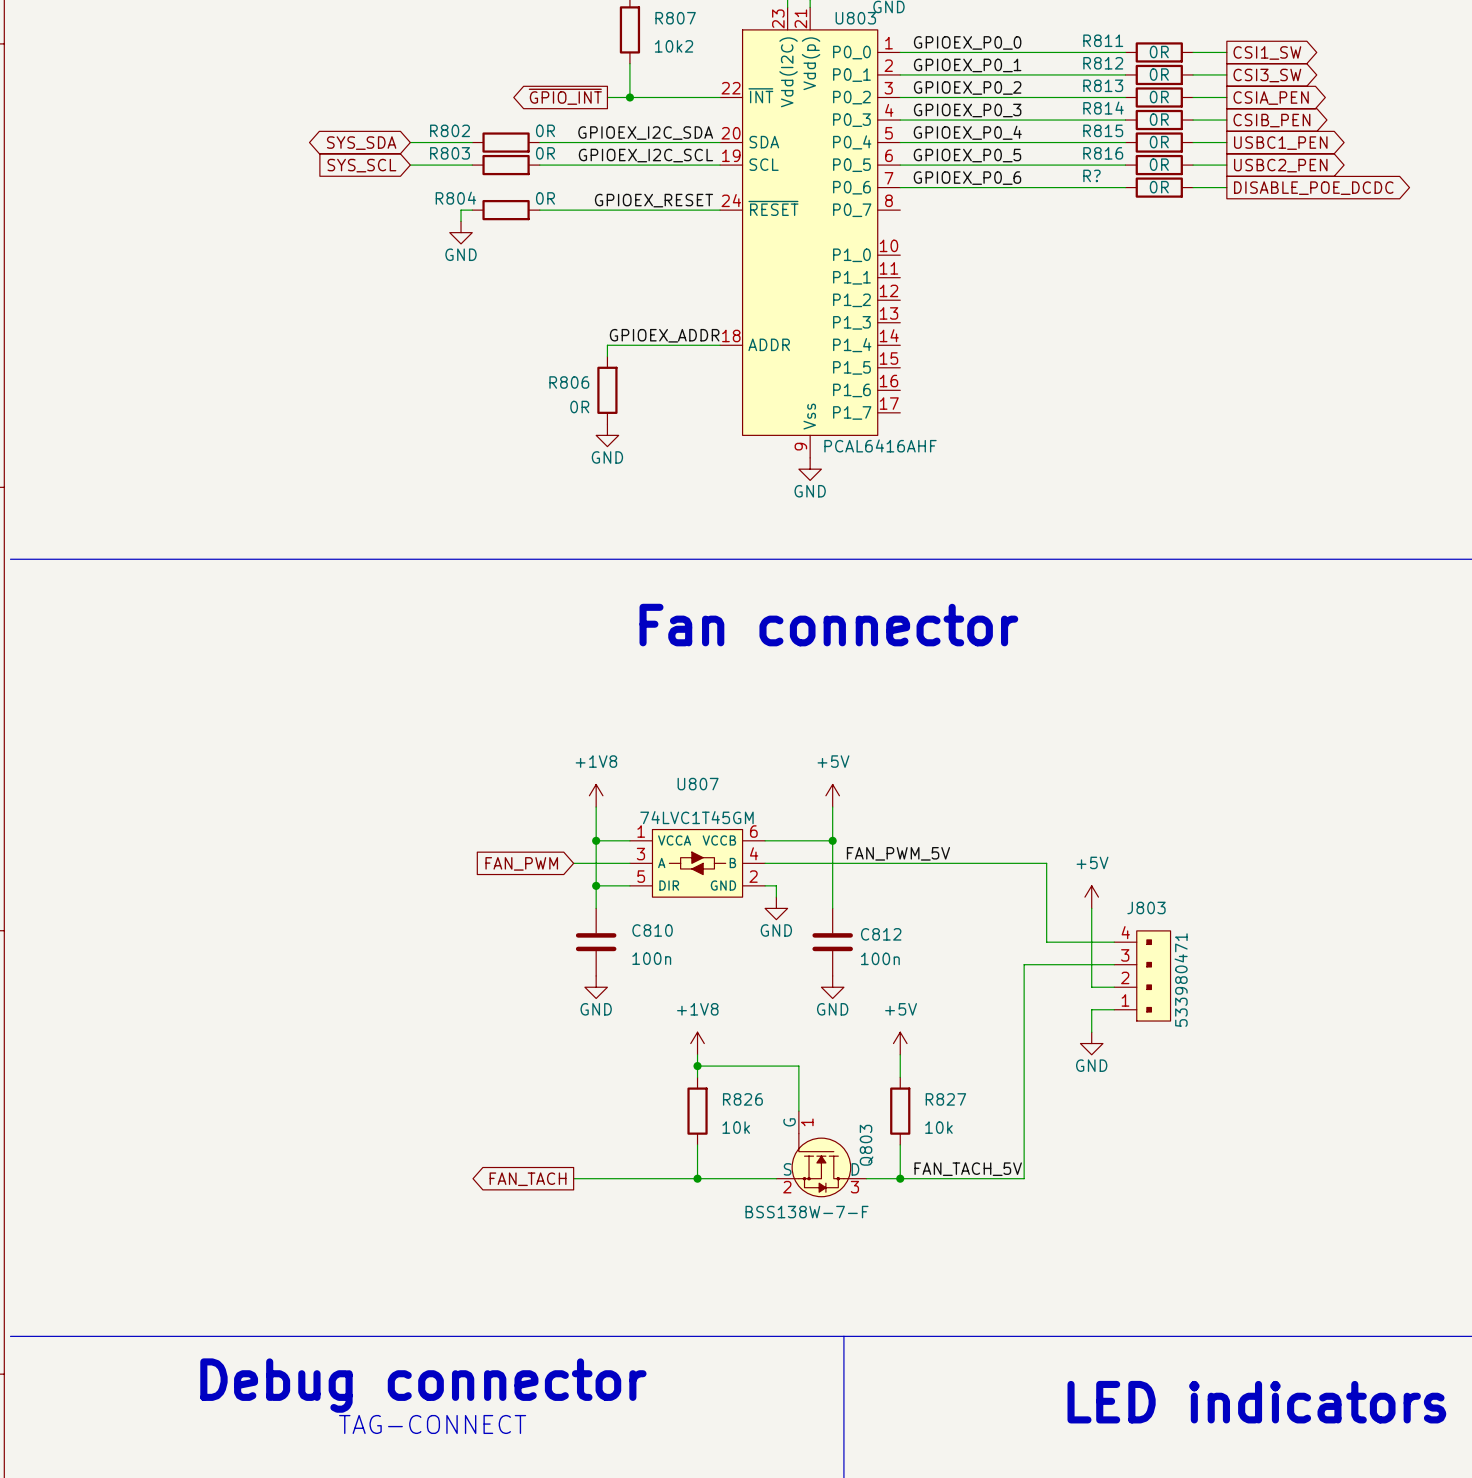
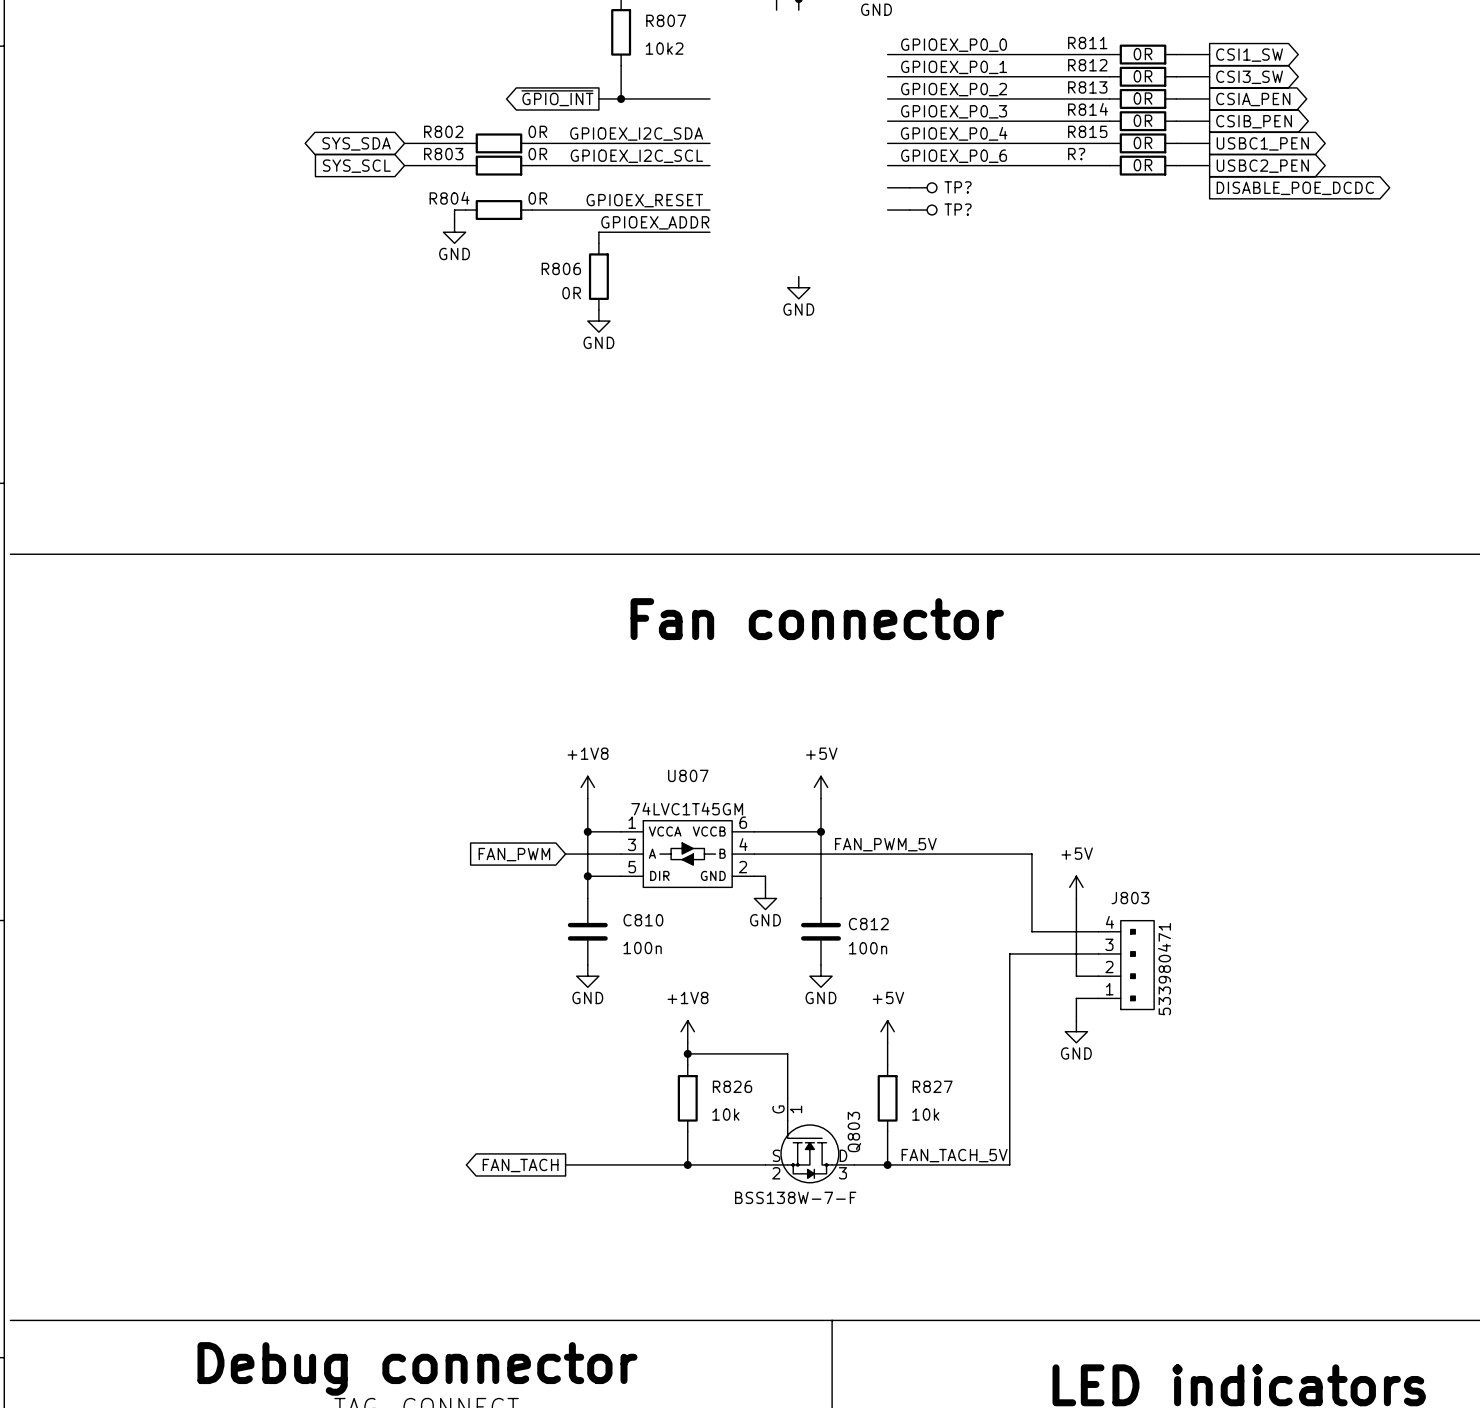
R816 name: R816 (1103, 153) -> R? (1076, 154)
label: GPIOEX_P0_5 (967, 155) -> GPIOEX_P0_6 (954, 156)
label: GPIOEX_P0_6 (967, 178) -> none
wire: (922, 187) (1125, 187) -> none
TP?: none -> (923, 187)
R?: (1159, 187) -> none
wire: (1193, 187) (1226, 187) -> none
wire: none -> (887, 210) (909, 210)
TP?: none -> (923, 210)
U803: PCAL6416AHF (810, 232) -> none
power symbol: none -> GND (798, 287)
label position: GPIOEX_ADDR (664, 335) -> GPIOEX_ADDR (655, 222)
wire: (720, 345) (607, 345) (607, 356) -> (709, 232) (598, 232) (598, 243)
R806 position: (607, 390) -> (598, 276)
power symbol position: GND (607, 435) -> GND (598, 321)
power symbol: GND (810, 469) -> none

